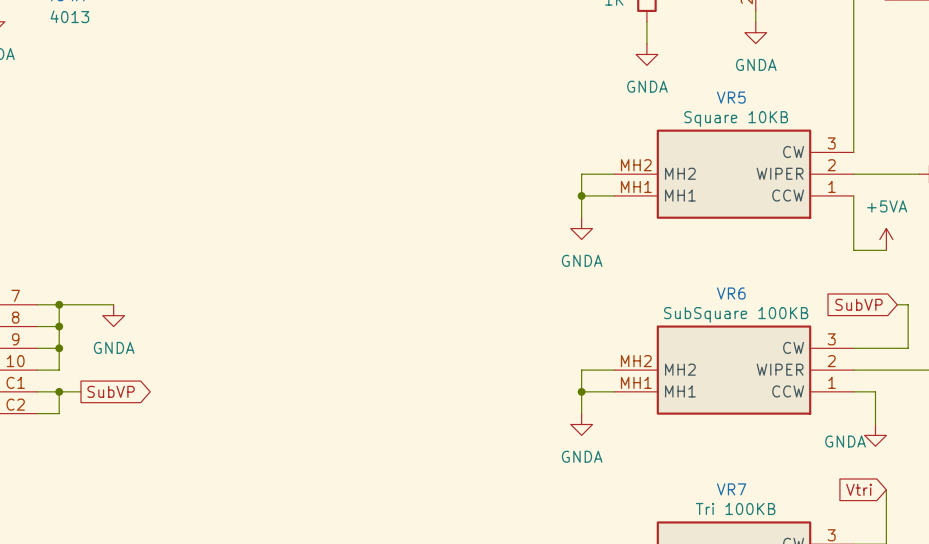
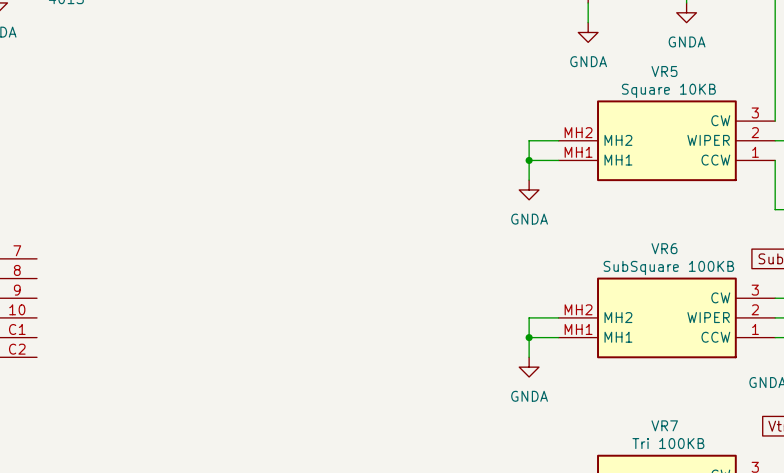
wire: (37, 304) (113, 304) -> none
wire: (59, 304) (59, 370) (37, 370) -> none
junction: (59, 304) -> none
power symbol: GNDA (113, 315) -> none
wire: (37, 326) (59, 326) -> none
junction: (59, 326) -> none
wire: (37, 348) (59, 348) -> none
junction: (59, 348) -> none
wire: (37, 391) (80, 391) -> none
wire: (59, 391) (59, 413) (37, 413) -> none
junction: (59, 391) -> none
global label: SubVP (111, 391) -> none

